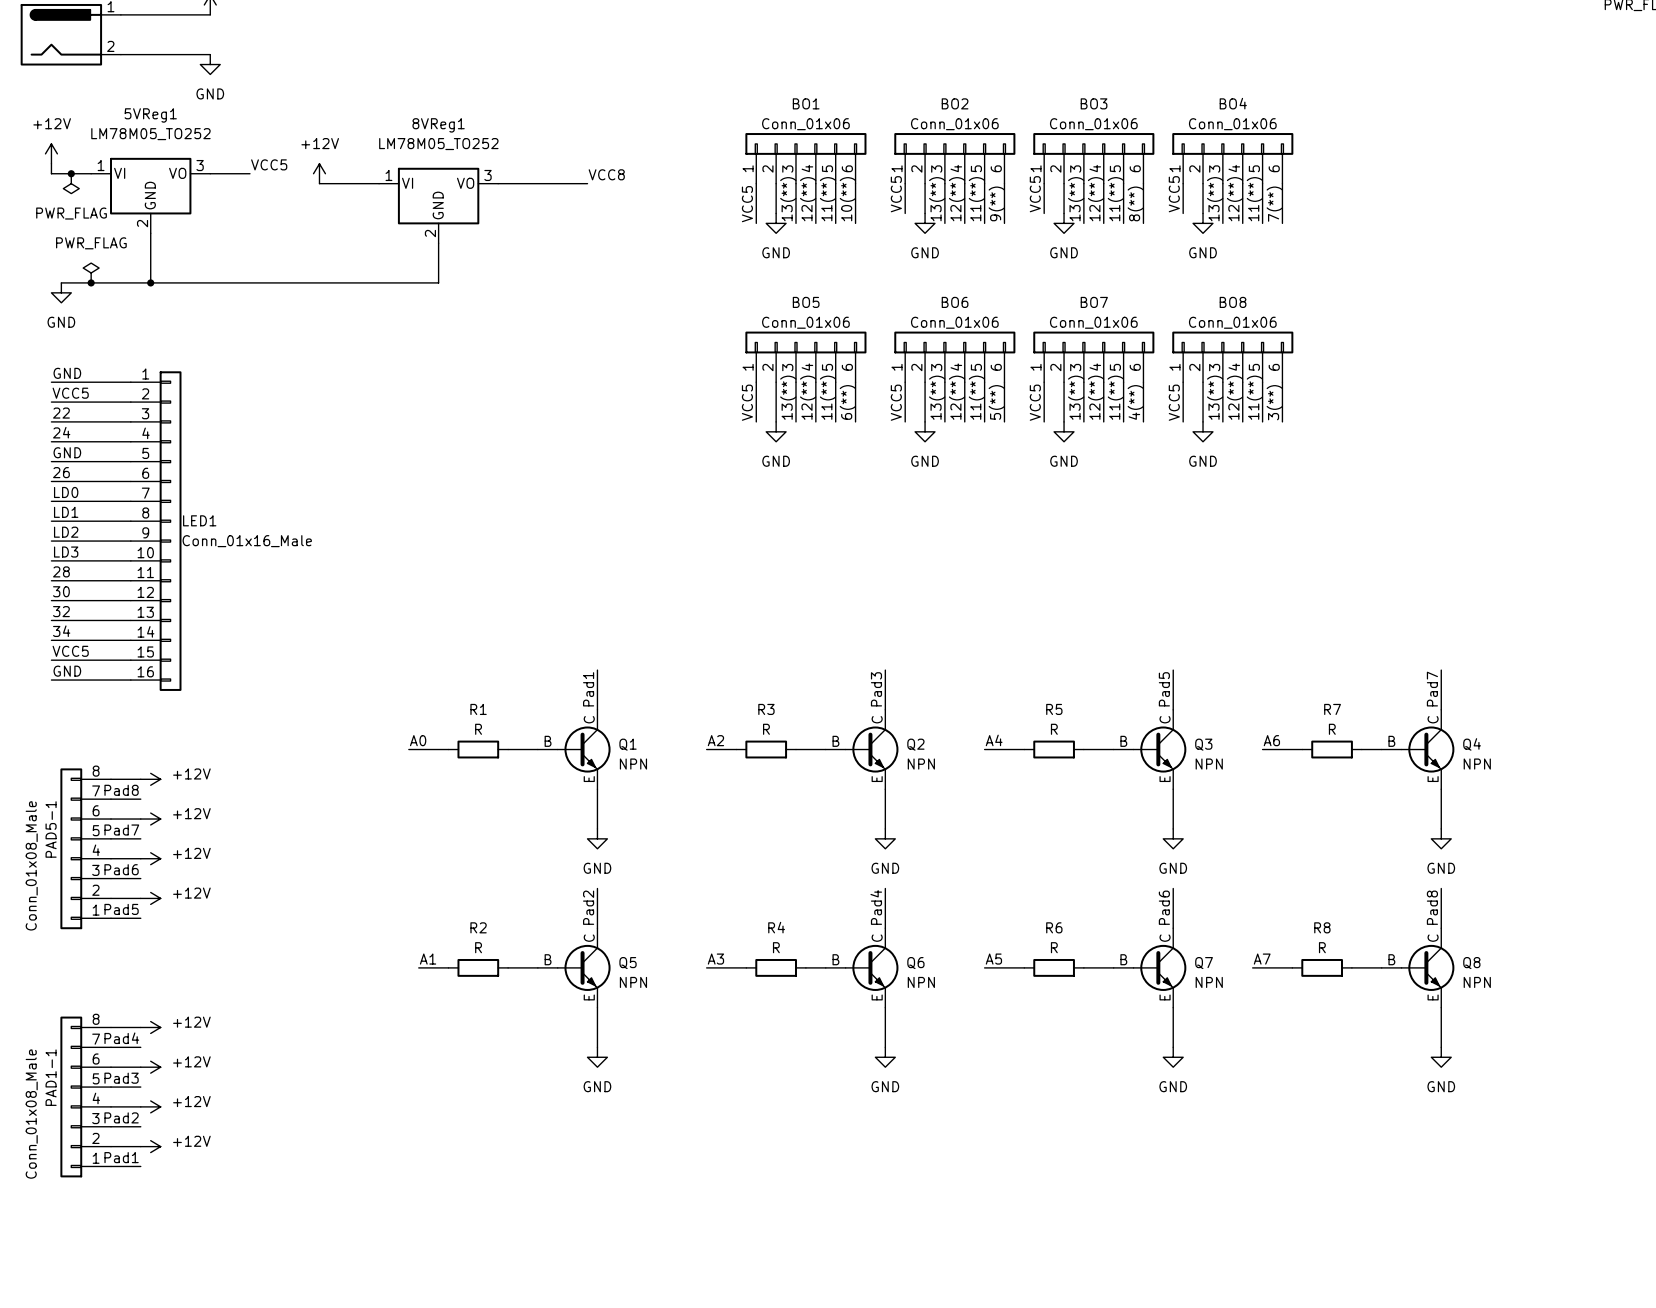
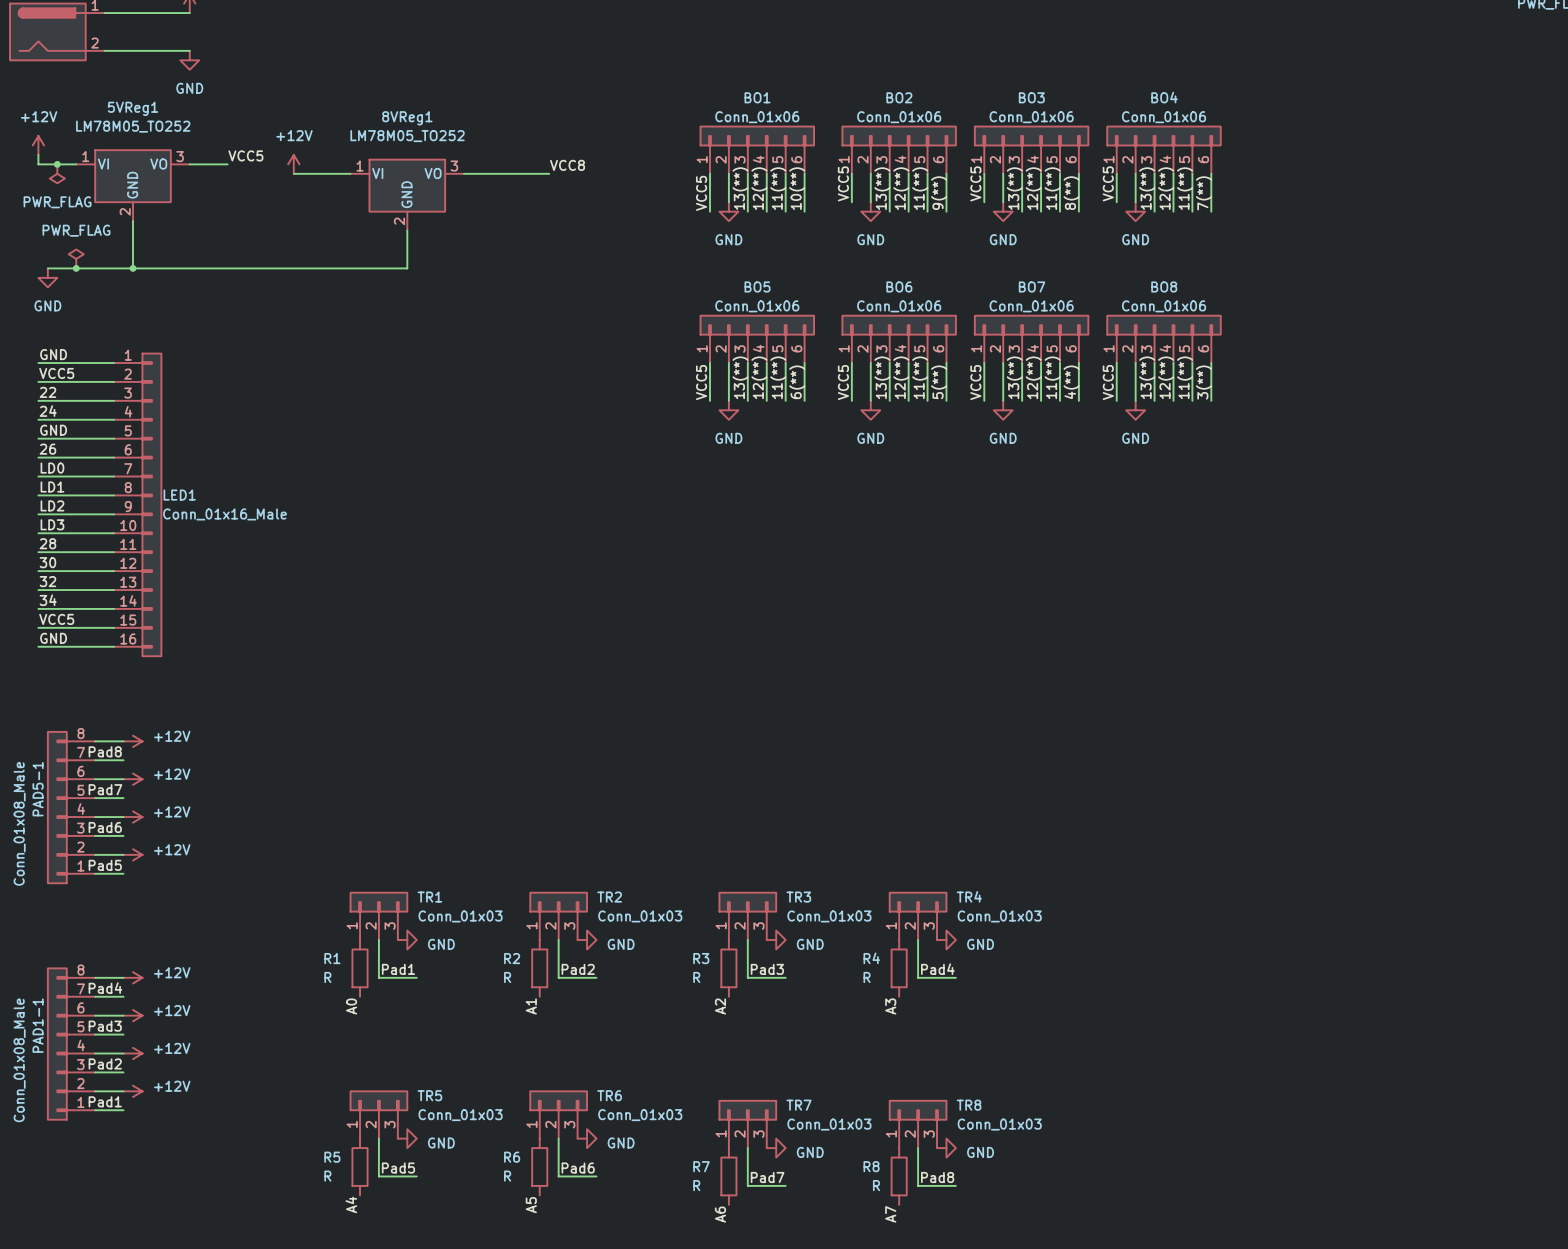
wire: (597, 670) (597, 709) -> none
wire: (885, 670) (885, 709) -> none
wire: (1173, 670) (1173, 709) -> none
wire: (1441, 670) (1441, 709) -> none
label: Pad1 (588, 689) -> none
label: Pad3 (876, 689) -> none
label: Pad5 (1164, 689) -> none
label: Pad7 (1432, 689) -> none
R1 name position: R1 (478, 709) -> R1 (332, 958)
R3 name position: R3 (766, 709) -> R3 (701, 958)
R5 name position: R5 (1054, 709) -> R5 (332, 1157)
R7 name position: R7 (1332, 709) -> R7 (701, 1166)
R1 value position: R (478, 729) -> R (327, 977)
R3 value position: R (766, 729) -> R (696, 977)
R5 value position: R (1054, 729) -> R (327, 1176)
R7 value position: R (1332, 729) -> R (696, 1185)
label: A0 (418, 740) -> none
label: A2 (715, 740) -> none
label: A4 (994, 740) -> none
label: A6 (1271, 740) -> none
wire: (408, 749) (448, 749) -> none
R1 rotation: 0° (478, 749) -> 90° clockwise (360, 968)
R1 position: (478, 749) -> (360, 968)
wire: (508, 749) (537, 749) -> none
Q1: NPN (574, 749) -> none
wire: (706, 749) (736, 749) -> none
R3 rotation: 0° (766, 749) -> 90° clockwise (728, 968)
R3 position: (766, 749) -> (728, 968)
wire: (795, 749) (825, 749) -> none
Q2: NPN (862, 749) -> none
wire: (984, 749) (1024, 749) -> none
R5 rotation: 0° (1054, 749) -> 90° clockwise (360, 1167)
R5 position: (1054, 749) -> (360, 1167)
wire: (1083, 749) (1113, 749) -> none
Q3: NPN (1150, 749) -> none
wire: (1262, 749) (1302, 749) -> none
R7 rotation: 0° (1332, 749) -> 90° clockwise (728, 1176)
R7 position: (1332, 749) -> (728, 1176)
wire: (1361, 749) (1381, 749) -> none
Q4: NPN (1418, 749) -> none
wire: (597, 789) (597, 828) -> none
wire: (885, 789) (885, 828) -> none
wire: (1173, 789) (1173, 828) -> none
wire: (1441, 789) (1441, 828) -> none
power symbol: GND (597, 838) -> none
power symbol: GND (885, 838) -> none
power symbol: GND (1173, 838) -> none
power symbol: GND (1441, 838) -> none
wire: (597, 888) (597, 928) -> none
wire: (885, 888) (885, 928) -> none
wire: (1173, 888) (1173, 928) -> none
wire: (1441, 888) (1441, 928) -> none
label rotation: 0° (588, 907) -> 90° clockwise (578, 969)
label position: Pad2 (588, 907) -> Pad2 (578, 969)
label rotation: 0° (876, 907) -> 90° clockwise (937, 969)
label position: Pad4 (876, 907) -> Pad4 (937, 969)
label: Pad6 (1164, 907) -> none
label: Pad8 (1432, 907) -> none
R2 name position: R2 (478, 927) -> R2 (512, 958)
R4 name position: R4 (776, 927) -> R4 (871, 958)
R6 name position: R6 (1054, 927) -> R6 (512, 1157)
R8 name position: R8 (1322, 927) -> R8 (871, 1166)
R2 value position: R (478, 947) -> R (507, 977)
R4 value position: R (776, 947) -> R (867, 977)
R6 value position: R (1054, 947) -> R (507, 1176)
R8 value position: R (1322, 947) -> R (876, 1185)
label rotation: 0° (428, 959) -> 90° counterclockwise (531, 1006)
label position: A1 (428, 959) -> A1 (531, 1006)
label: A3 (715, 959) -> none
label: A5 (993, 959) -> none
label: A7 (1262, 959) -> none
TR1: none -> Conn_01x03 (378, 915)
TR2: none -> Conn_01x03 (558, 915)
TR3: none -> Conn_01x03 (747, 915)
TR4: none -> Conn_01x03 (918, 915)
wire: (418, 967) (448, 967) -> none
R2 rotation: 0° (478, 967) -> 90° clockwise (539, 968)
R2 position: (478, 967) -> (539, 968)
Q5: NPN (574, 967) -> none
wire: (706, 967) (746, 967) -> none
R4 rotation: 0° (776, 967) -> 90° clockwise (899, 968)
R4 position: (776, 967) -> (899, 968)
wire: (805, 967) (825, 967) -> none
Q6: NPN (862, 967) -> none
wire: (984, 967) (1024, 967) -> none
R6 rotation: 0° (1054, 967) -> 90° clockwise (539, 1167)
R6 position: (1054, 967) -> (539, 1167)
wire: (1083, 967) (1113, 967) -> none
Q7: NPN (1150, 967) -> none
wire: (1252, 967) (1292, 967) -> none
R8 rotation: 0° (1322, 967) -> 90° clockwise (899, 1176)
R8 position: (1322, 967) -> (899, 1176)
wire: (1351, 967) (1381, 967) -> none
Q8: NPN (1418, 967) -> none
wire: none -> (378, 939) (378, 977) (416, 977)
power symbol: none -> GND (407, 939)
power symbol: none -> GND (587, 939)
wire: none -> (747, 939) (747, 977) (785, 977)
power symbol: none -> GND (776, 939)
wire: none -> (918, 939) (918, 977) (955, 977)
power symbol: none -> GND (946, 939)
wire: (885, 1007) (885, 1047) -> none
wire: (1173, 1007) (1173, 1047) -> none
wire: (1441, 1007) (1441, 1047) -> none
label: none -> Pad1 (398, 969)
label: none -> Pad3 (767, 969)
wire: (597, 1027) (597, 1047) -> (558, 977) (596, 977)
label: none -> A0 (351, 1006)
power symbol: GND (597, 1057) -> none
label: none -> A2 (720, 1006)
power symbol: GND (885, 1057) -> none
label: none -> A3 (890, 1006)
power symbol: GND (1173, 1057) -> none
power symbol: GND (1441, 1057) -> none
TR5: none -> Conn_01x03 (378, 1114)
TR6: none -> Conn_01x03 (558, 1114)
TR7: none -> Conn_01x03 (747, 1123)
TR8: none -> Conn_01x03 (918, 1123)
wire: none -> (378, 1138) (378, 1176) (416, 1176)
power symbol: none -> GND (407, 1138)
wire: none -> (558, 1138) (558, 1176) (596, 1176)
power symbol: none -> GND (587, 1138)
wire: none -> (747, 1148) (747, 1185) (785, 1185)
power symbol: none -> GND (776, 1148)
wire: none -> (918, 1148) (918, 1185) (955, 1185)
power symbol: none -> GND (946, 1148)
label: none -> Pad5 (398, 1168)
label: none -> Pad6 (578, 1168)
label: none -> Pad7 (767, 1177)
label: none -> Pad8 (937, 1177)
label: none -> A4 (351, 1204)
label: none -> A5 (531, 1205)
label: none -> A6 (720, 1214)
label: none -> A7 (890, 1214)

